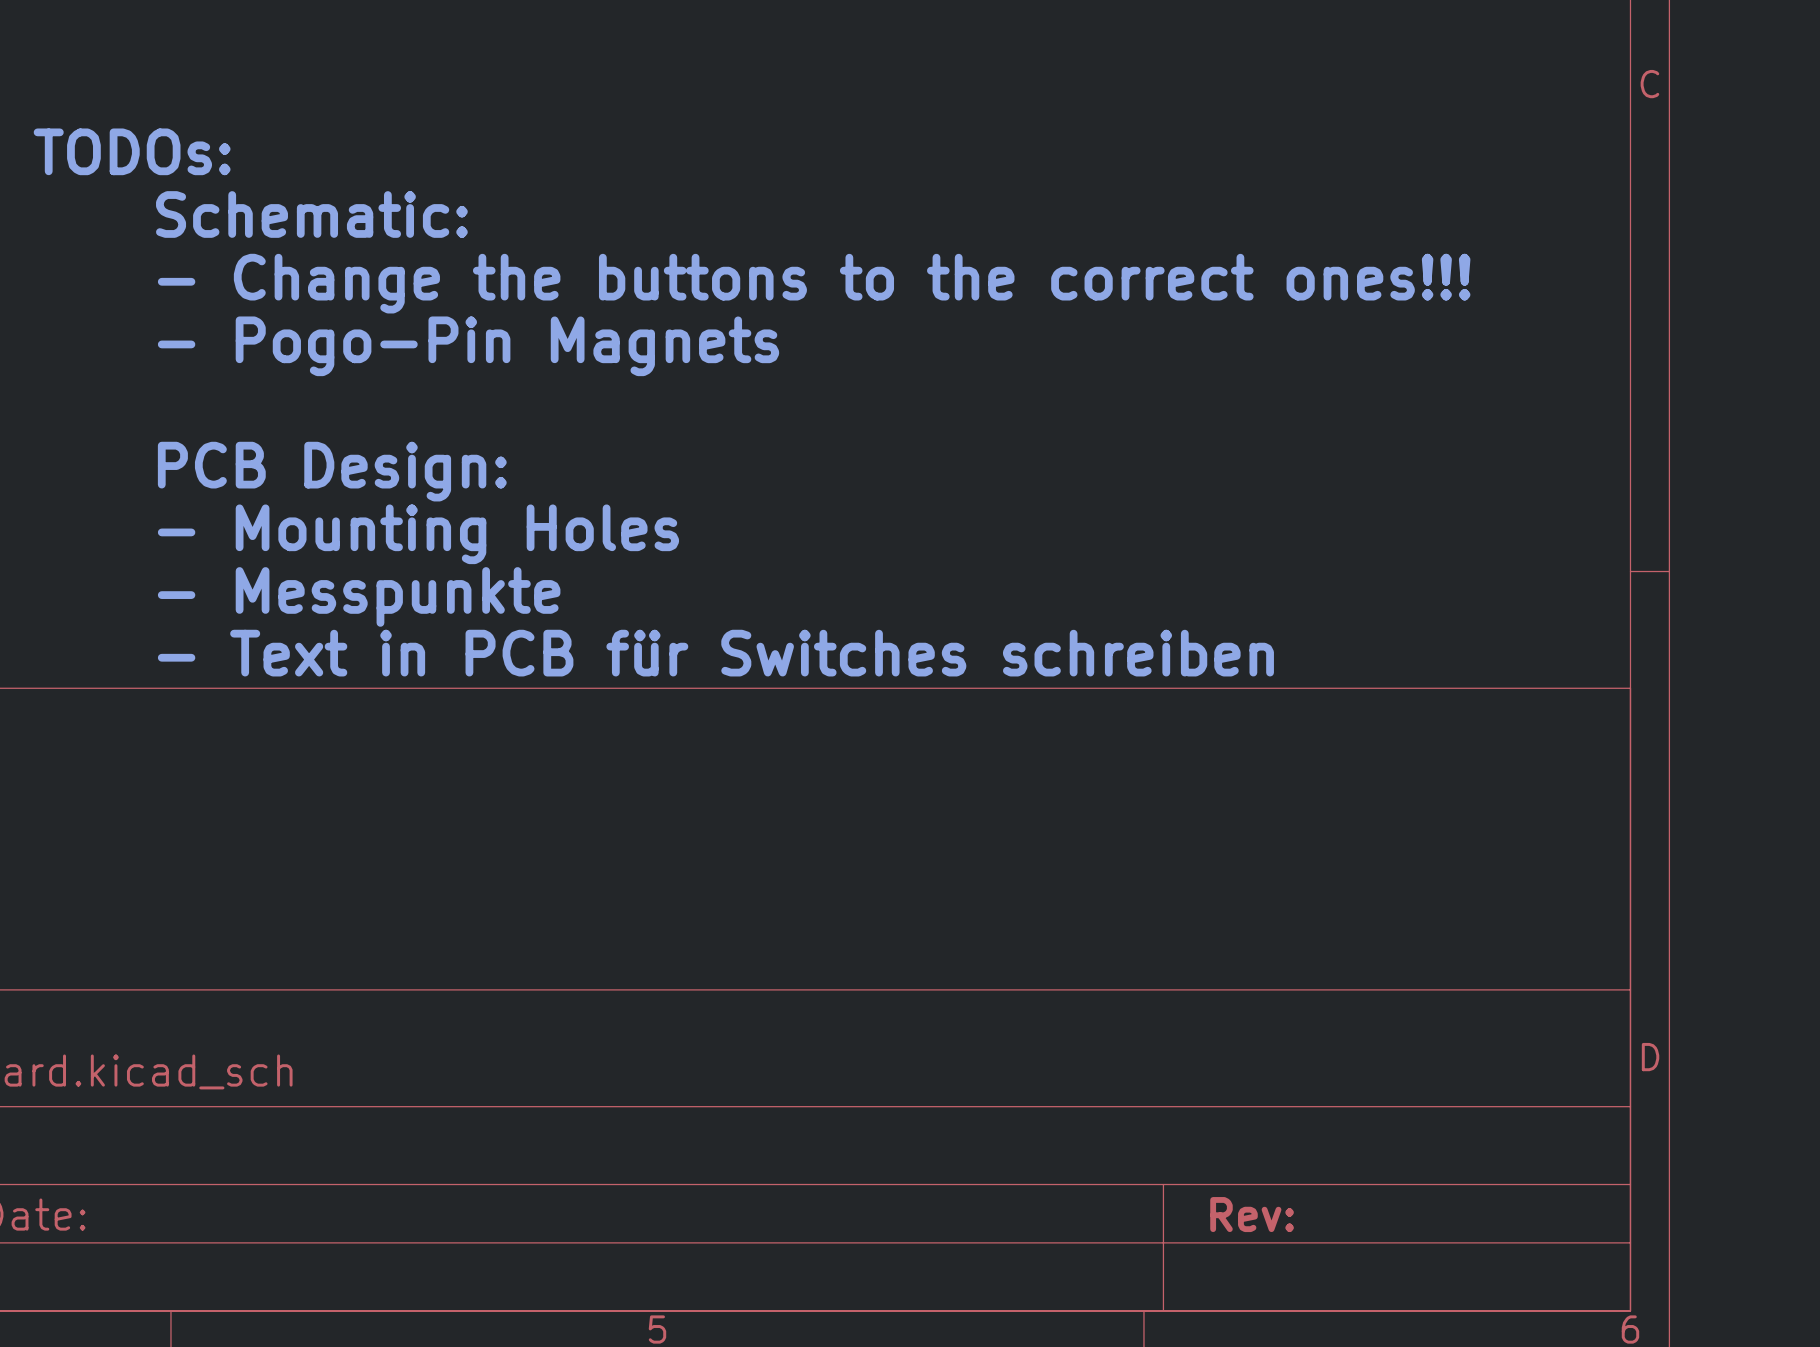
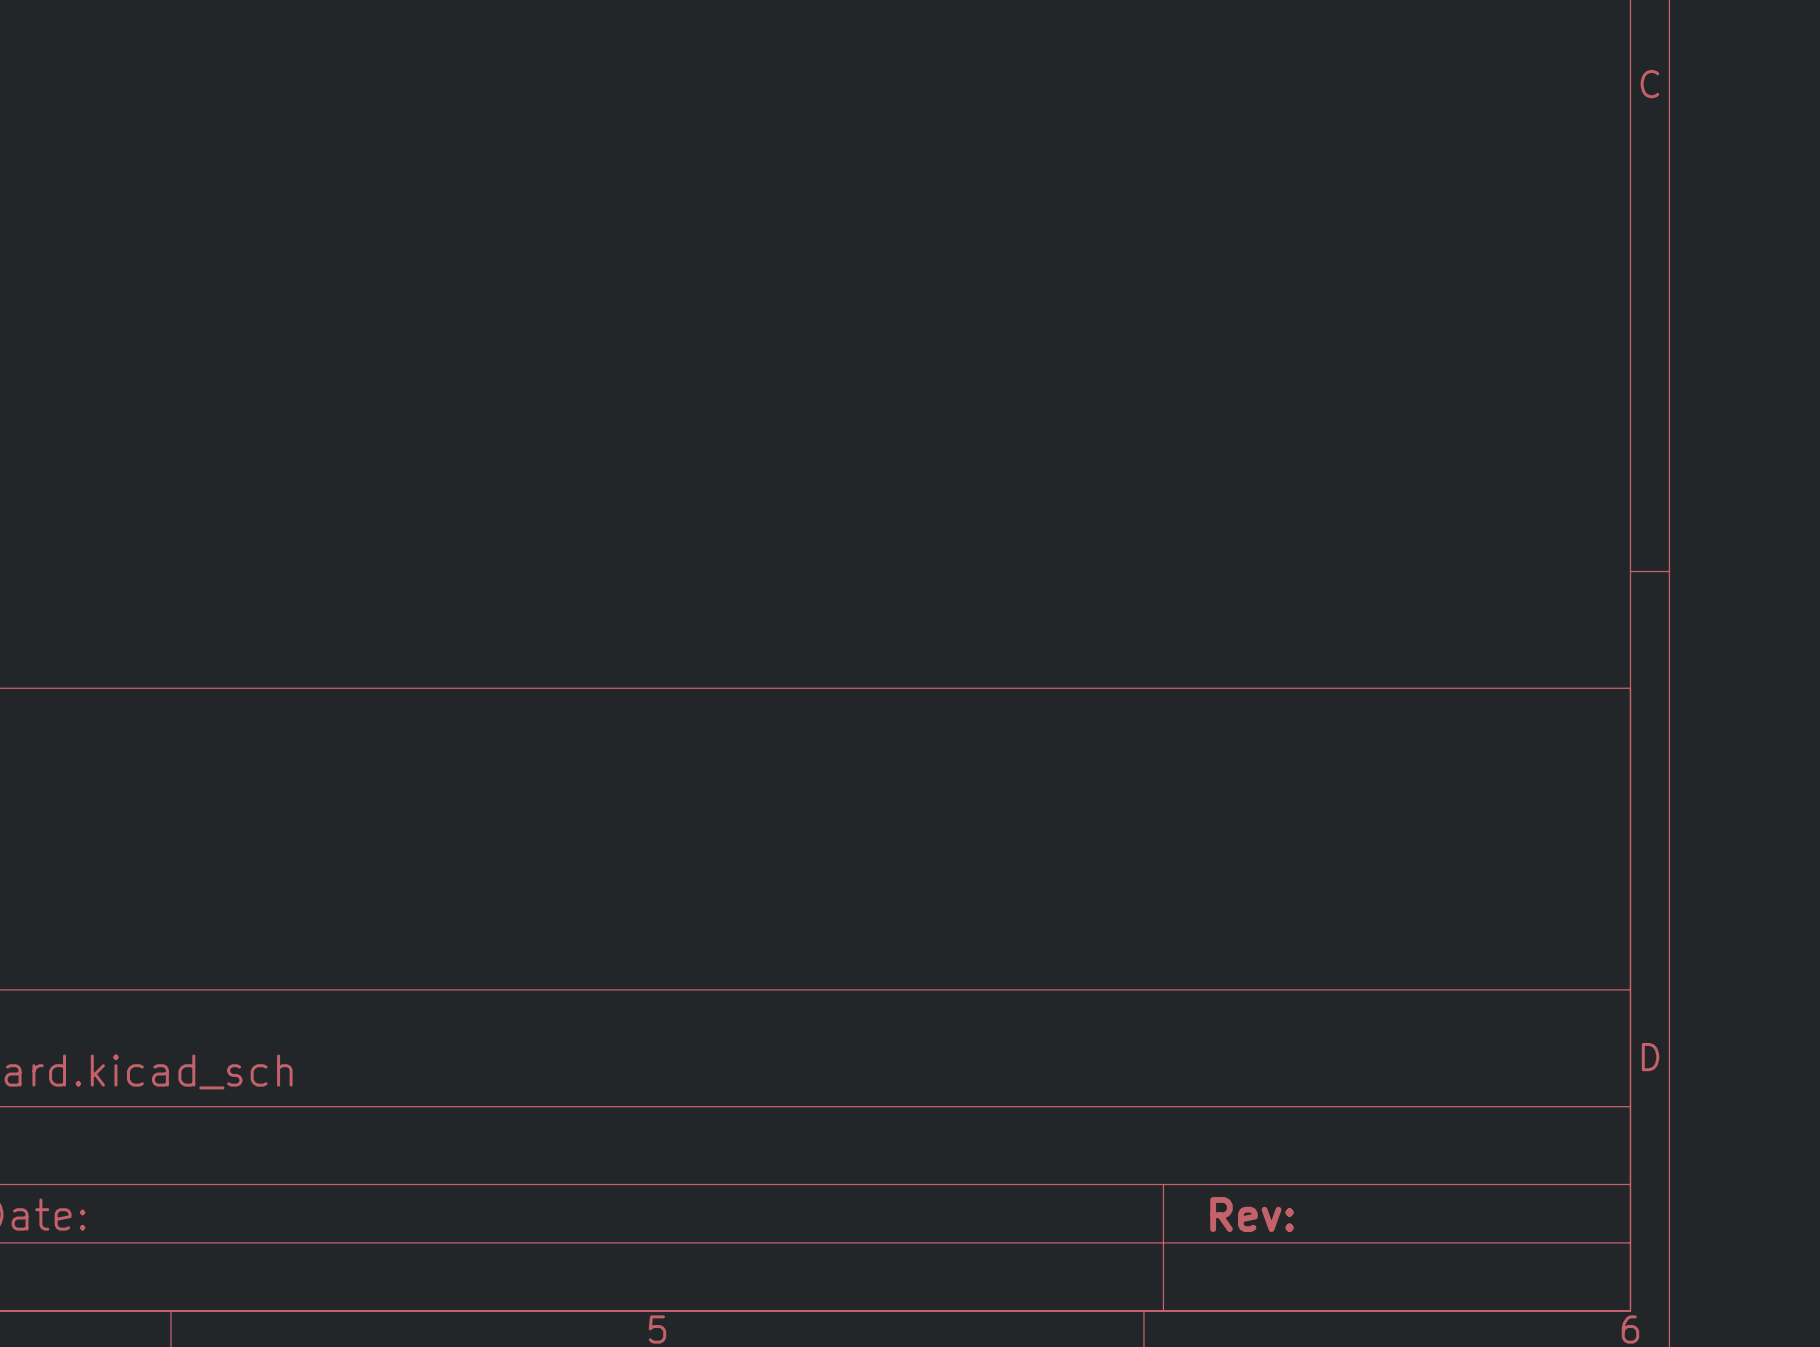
text: TODOs: (132, 151) -> none
text: Schematic: (311, 214) -> none
text: - Change the buttons to the correct ones!!! (814, 283) -> none
text: - Pogo-Pin Magnets (468, 346) -> none
text: PCB Design: (332, 471) -> none
text: - Mounting Holes (418, 534) -> none
text: - Messpunkte (359, 596) -> none
text: - Text in PCB für Switches schreiben (715, 653) -> none

